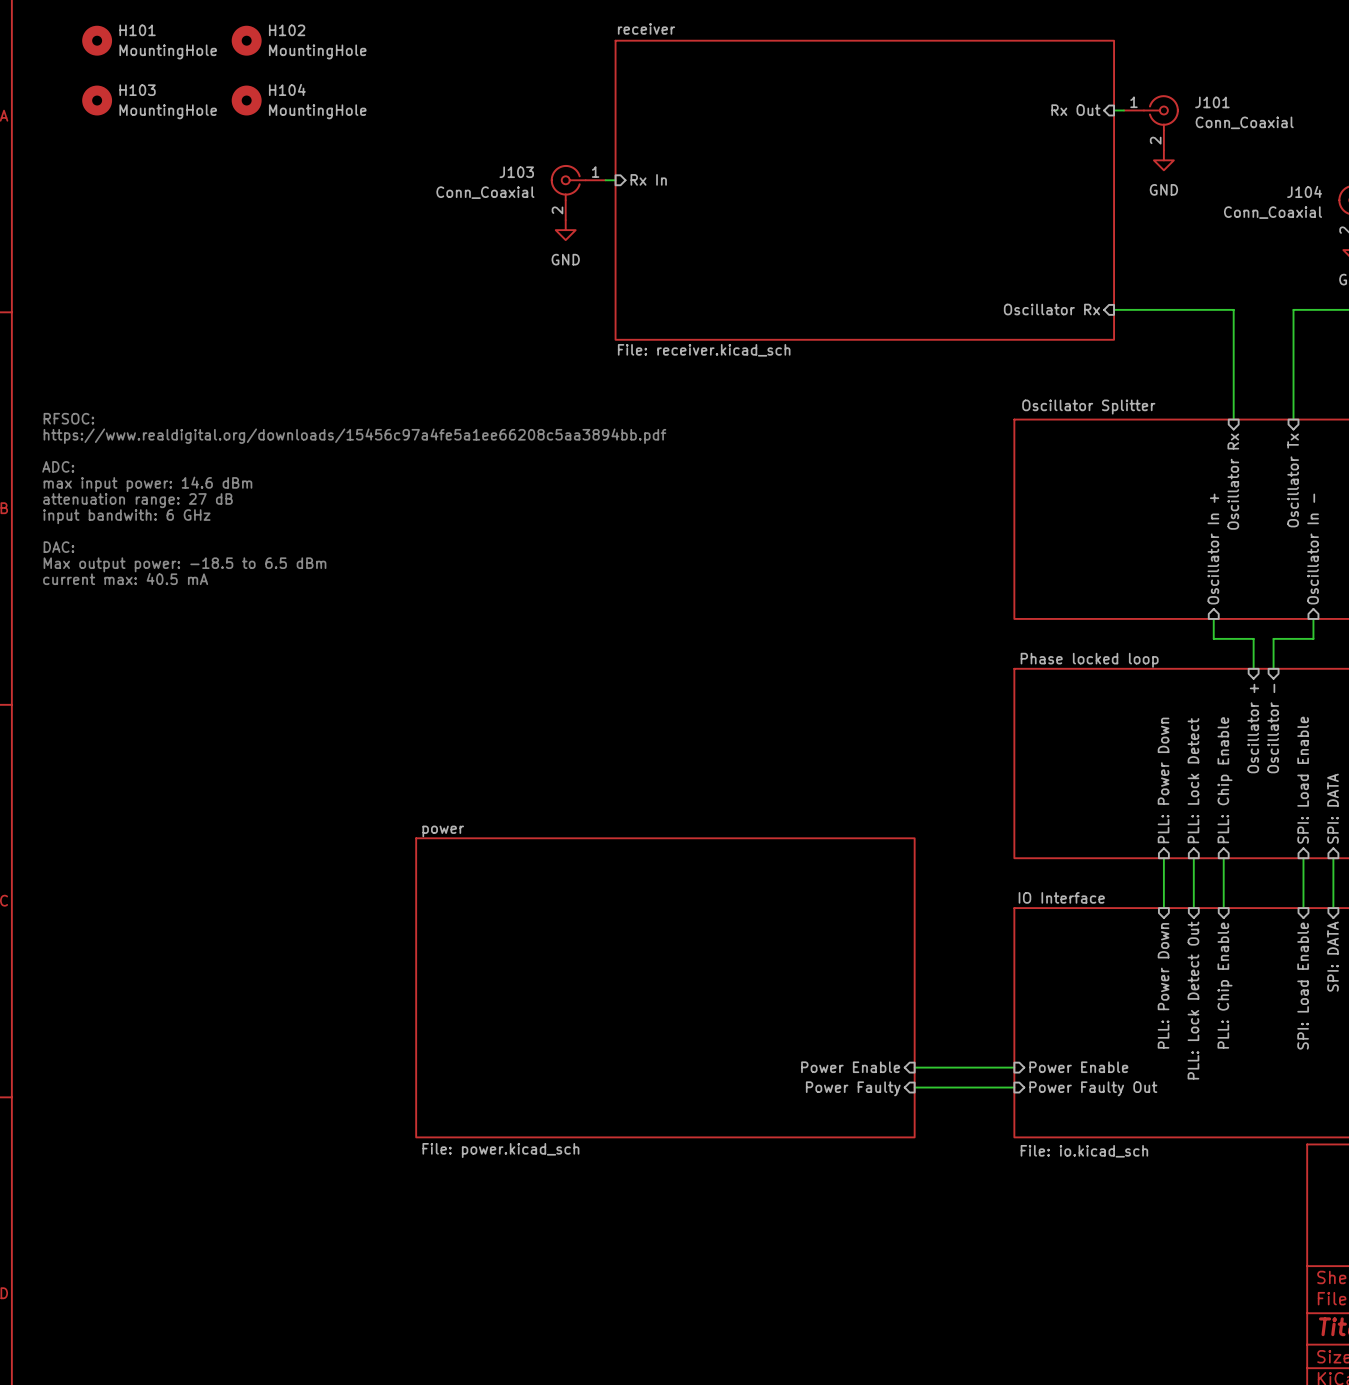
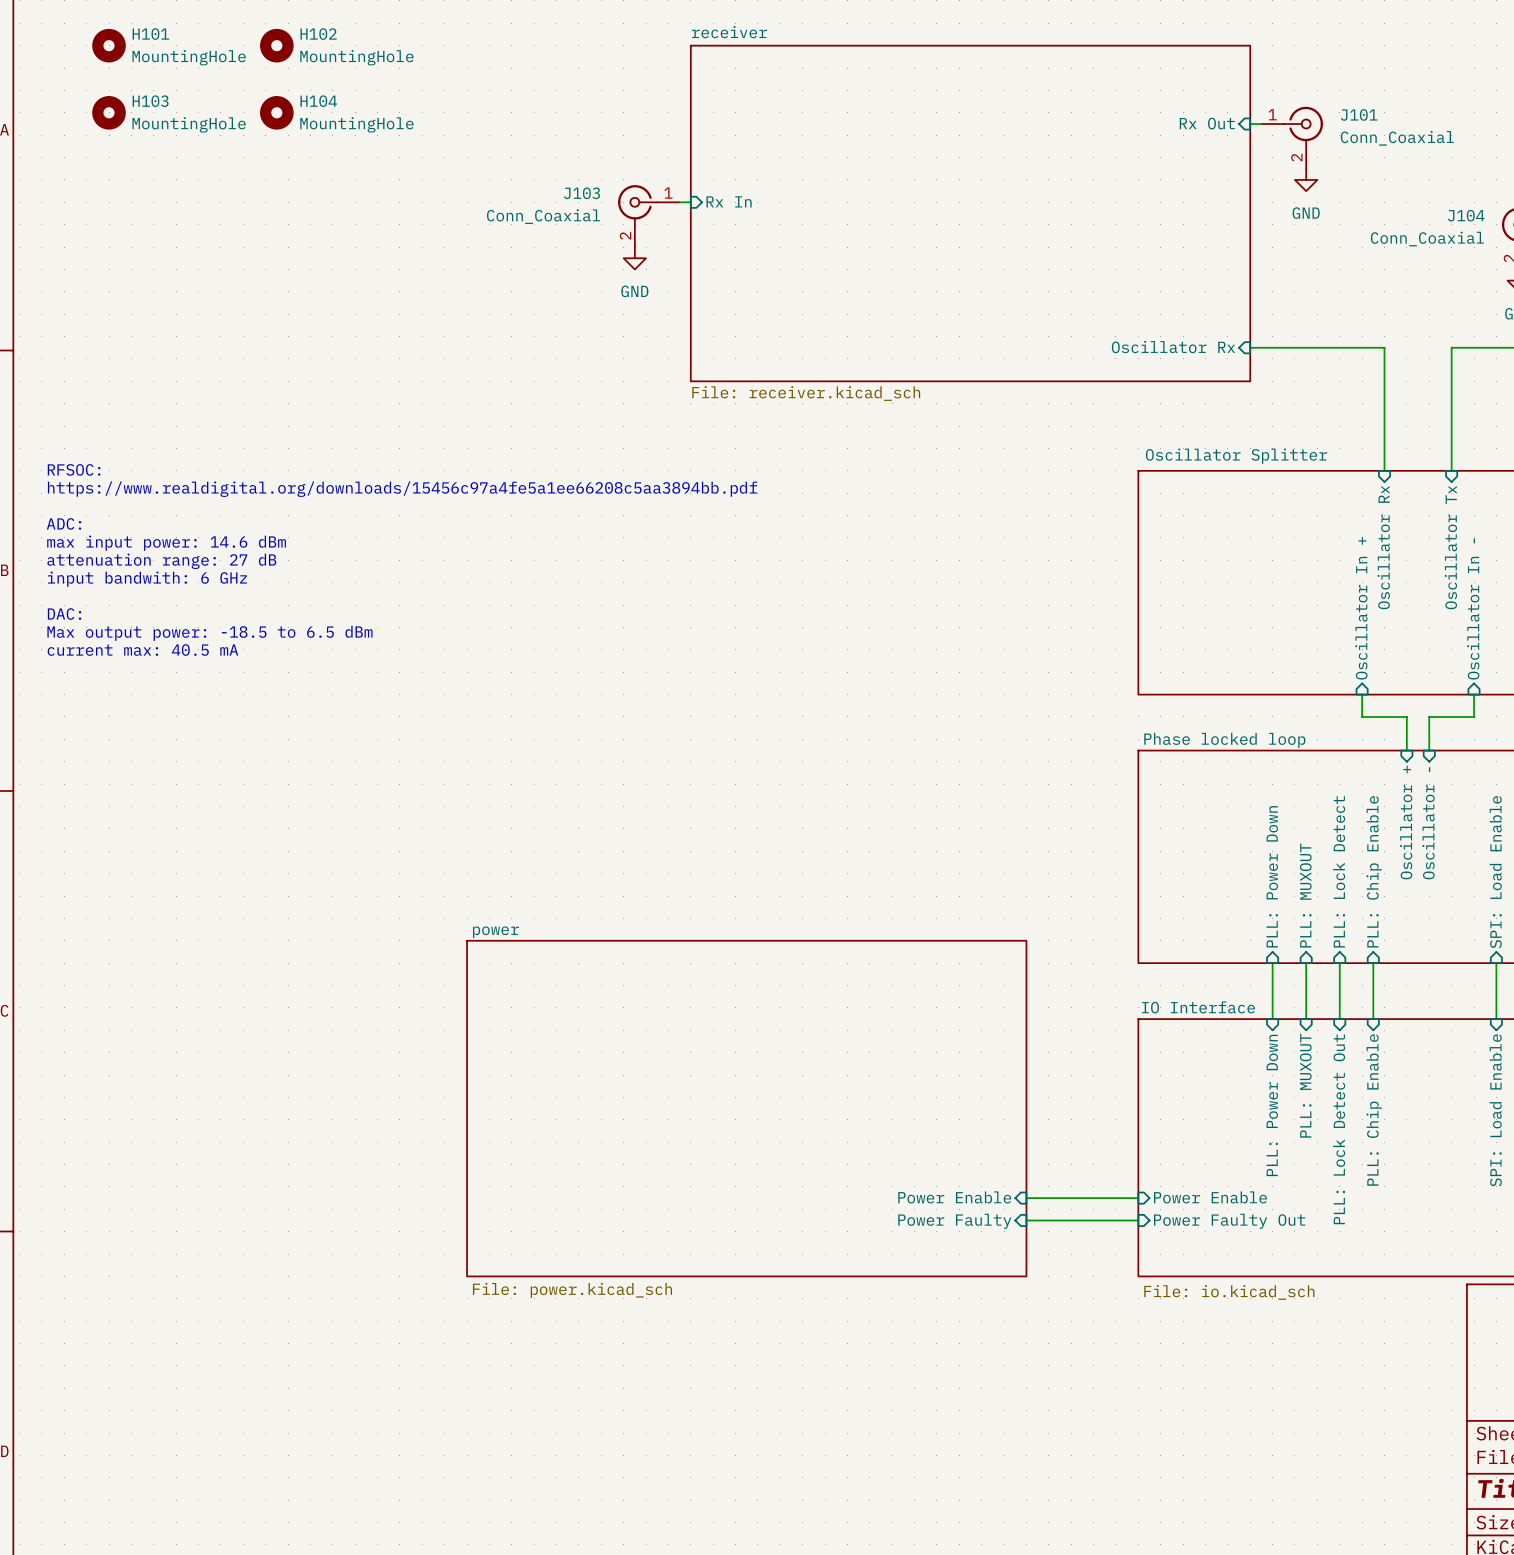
sheet pin: none -> PLL: Power Down (1272, 876)
sheet pin: PLL: Power Down (1163, 780) -> PLL: MUXOUT (1305, 895)
sheet pin: SPI: Load Enable (1303, 780) -> none
sheet pin: SPI: DATA (1333, 808) -> SPI: Load Enable (1495, 872)
wire: (1303, 858) (1303, 908) -> (1272, 963) (1272, 1019)
sheet pin: SPI: DATA (1333, 956) -> SPI: Load Enable (1495, 1110)
sheet pin: none -> PLL: Power Down (1272, 1105)
sheet pin: PLL: Power Down (1163, 985) -> PLL: MUXOUT (1305, 1085)
sheet pin: SPI: Load Enable (1303, 986) -> none

